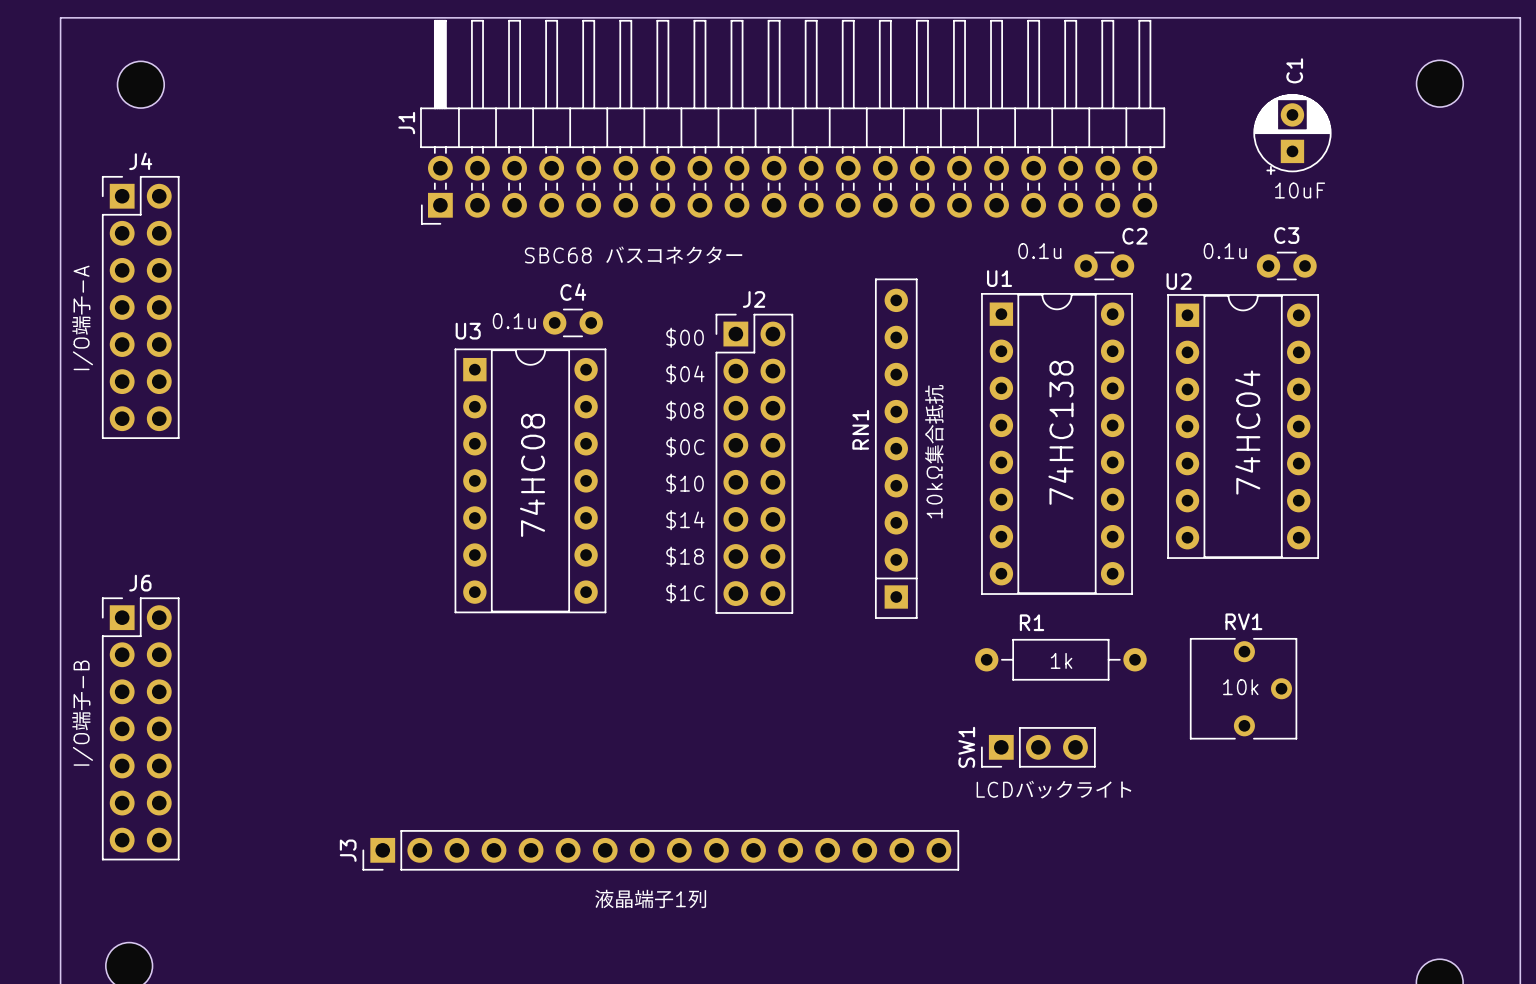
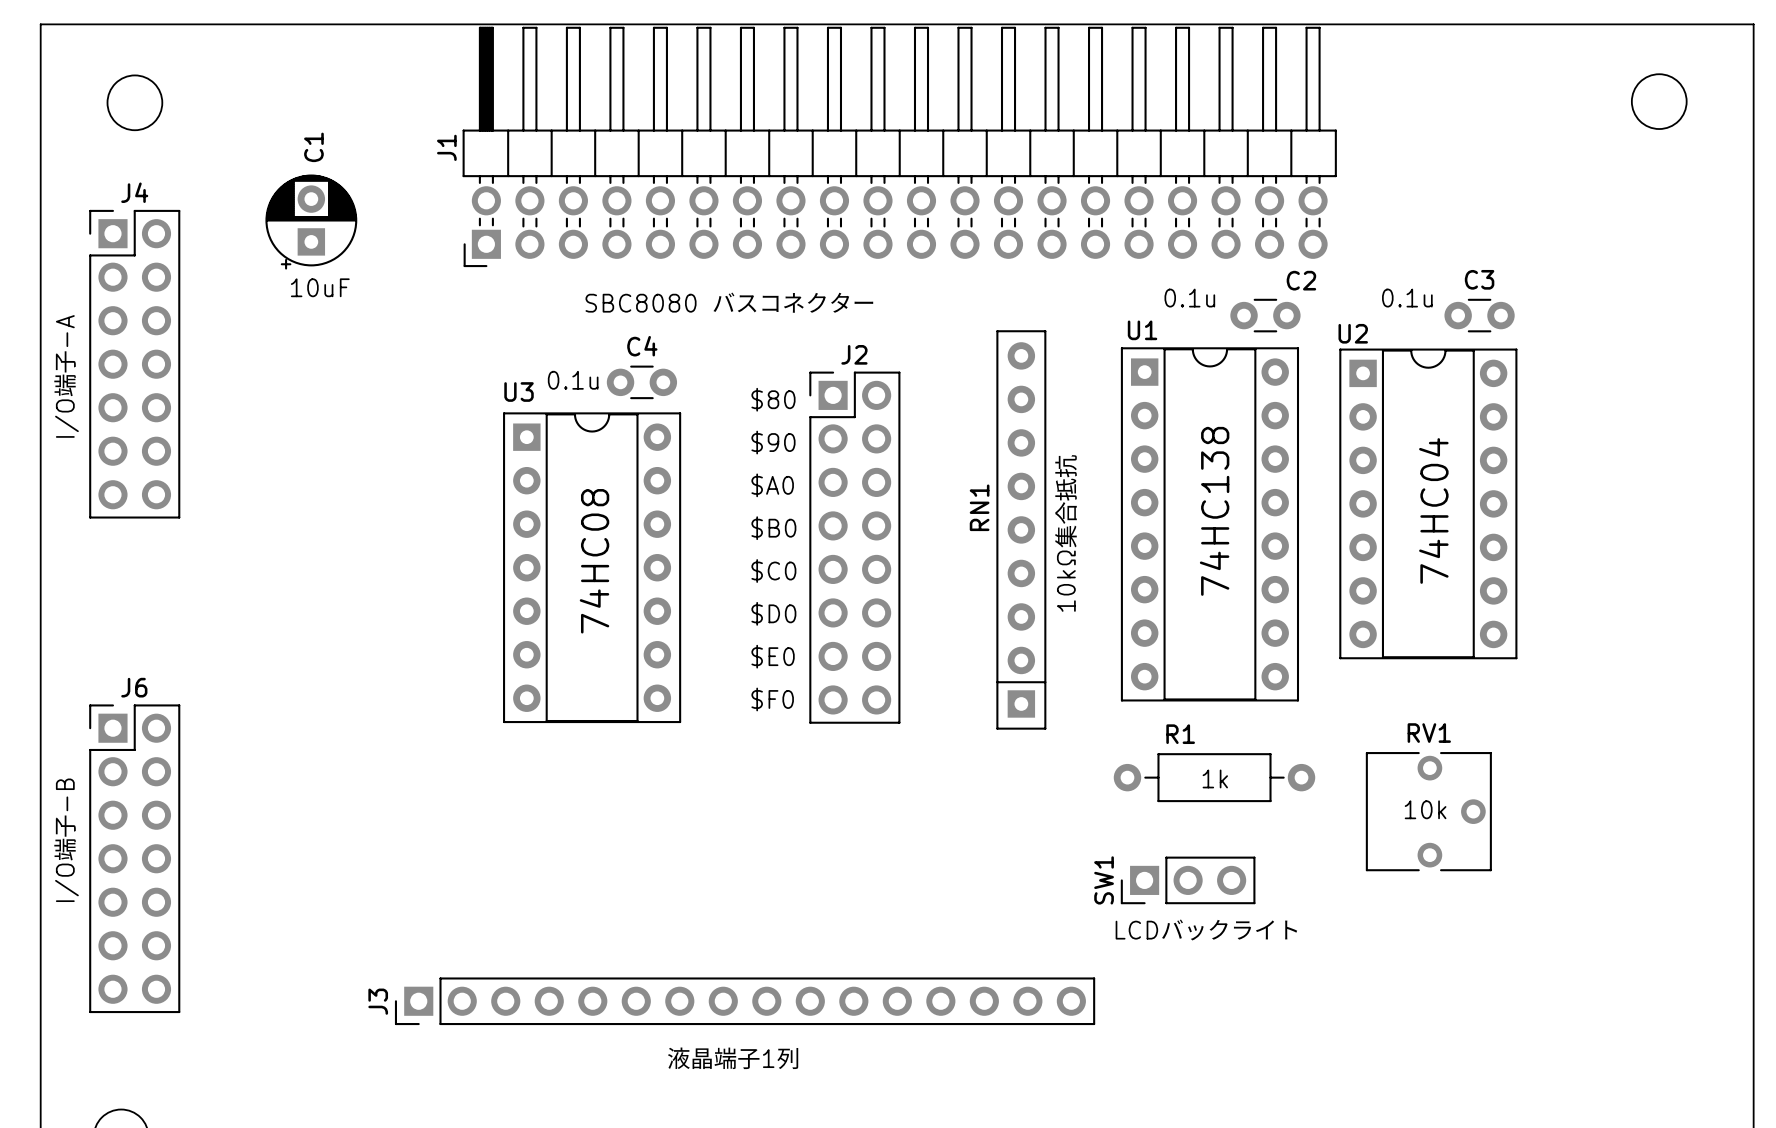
C1 position: (1292, 134) -> (311, 222)
text: 10uF (1300, 190) -> none
text: none -> 10uF (320, 287)
text: SBC68 バスコネクター (633, 255) -> SBC8080 バスコネクター (729, 302)
text: $00 (685, 337) -> $80 (773, 399)
text: $04 (685, 374) -> $90 (773, 442)
text: $08 (685, 410) -> $A0 (772, 485)
text: $0C (685, 447) -> $B0 (773, 528)
text: $10 (685, 483) -> $C0 (773, 571)
text: $14 (685, 520) -> $D0 (773, 613)
text: $18 (685, 556) -> $E0 (773, 656)
text: $1C (685, 593) -> $F0 (772, 699)

